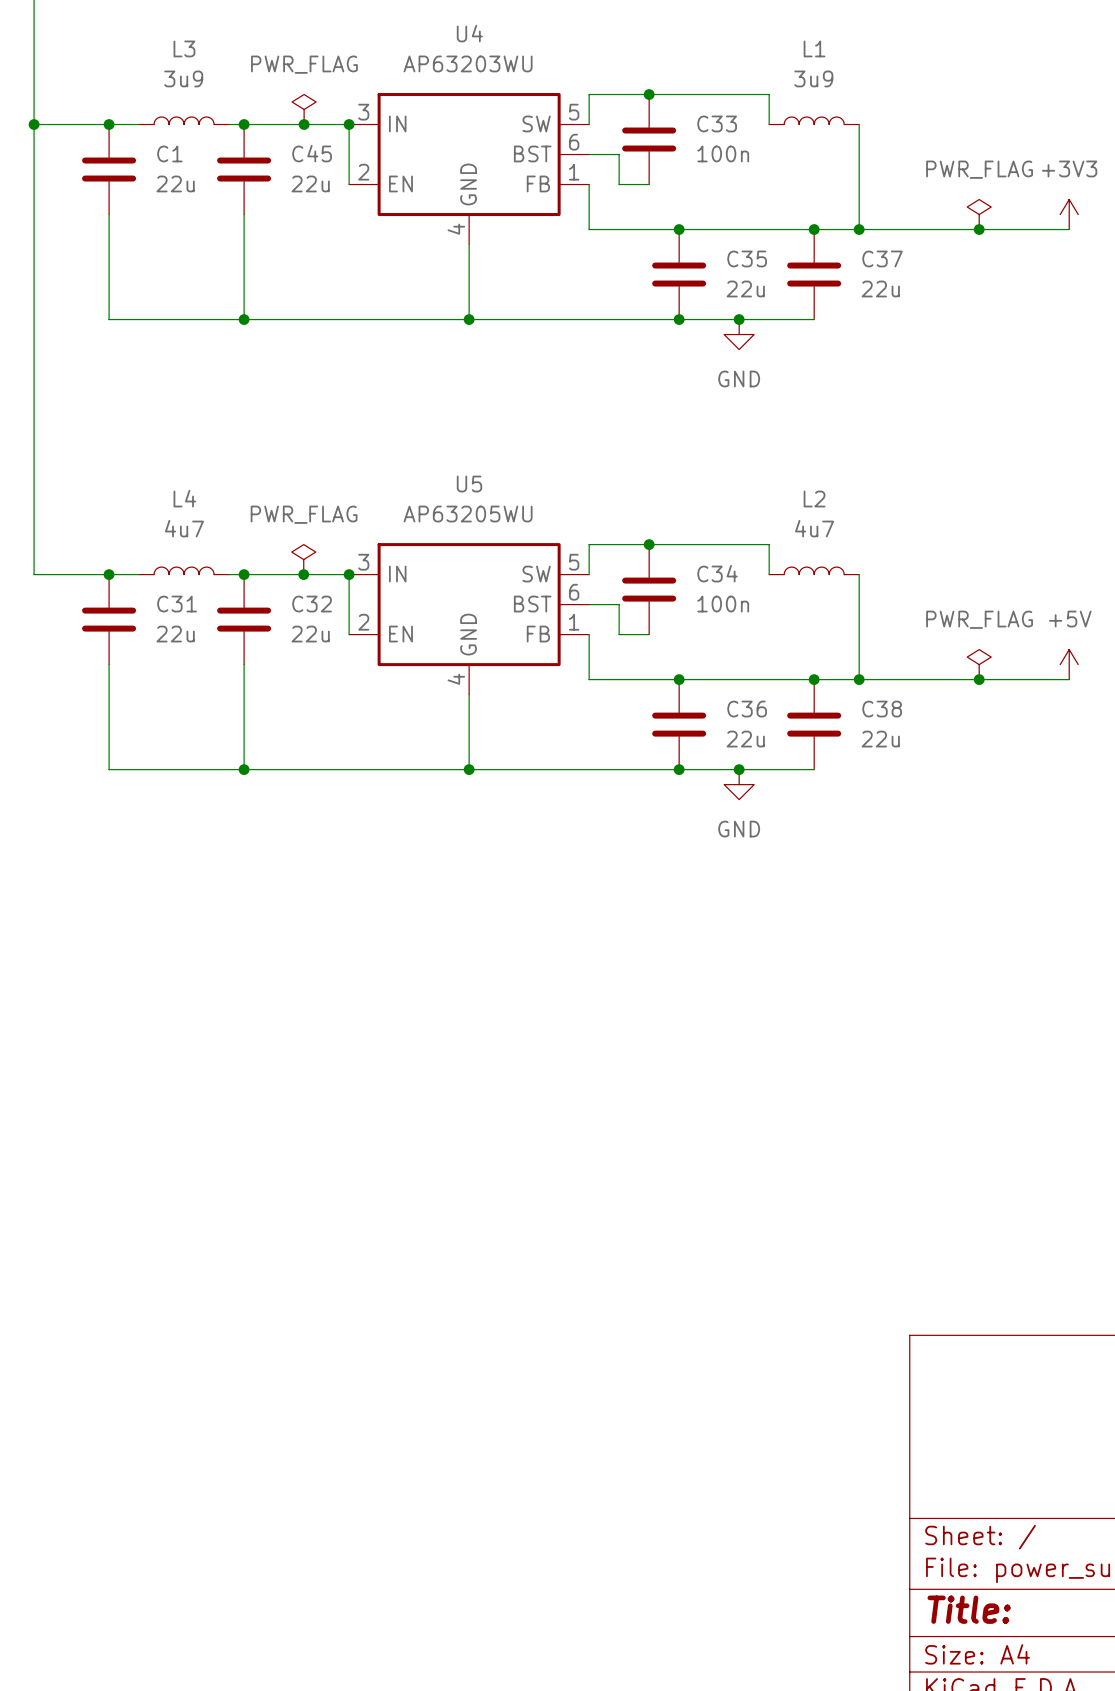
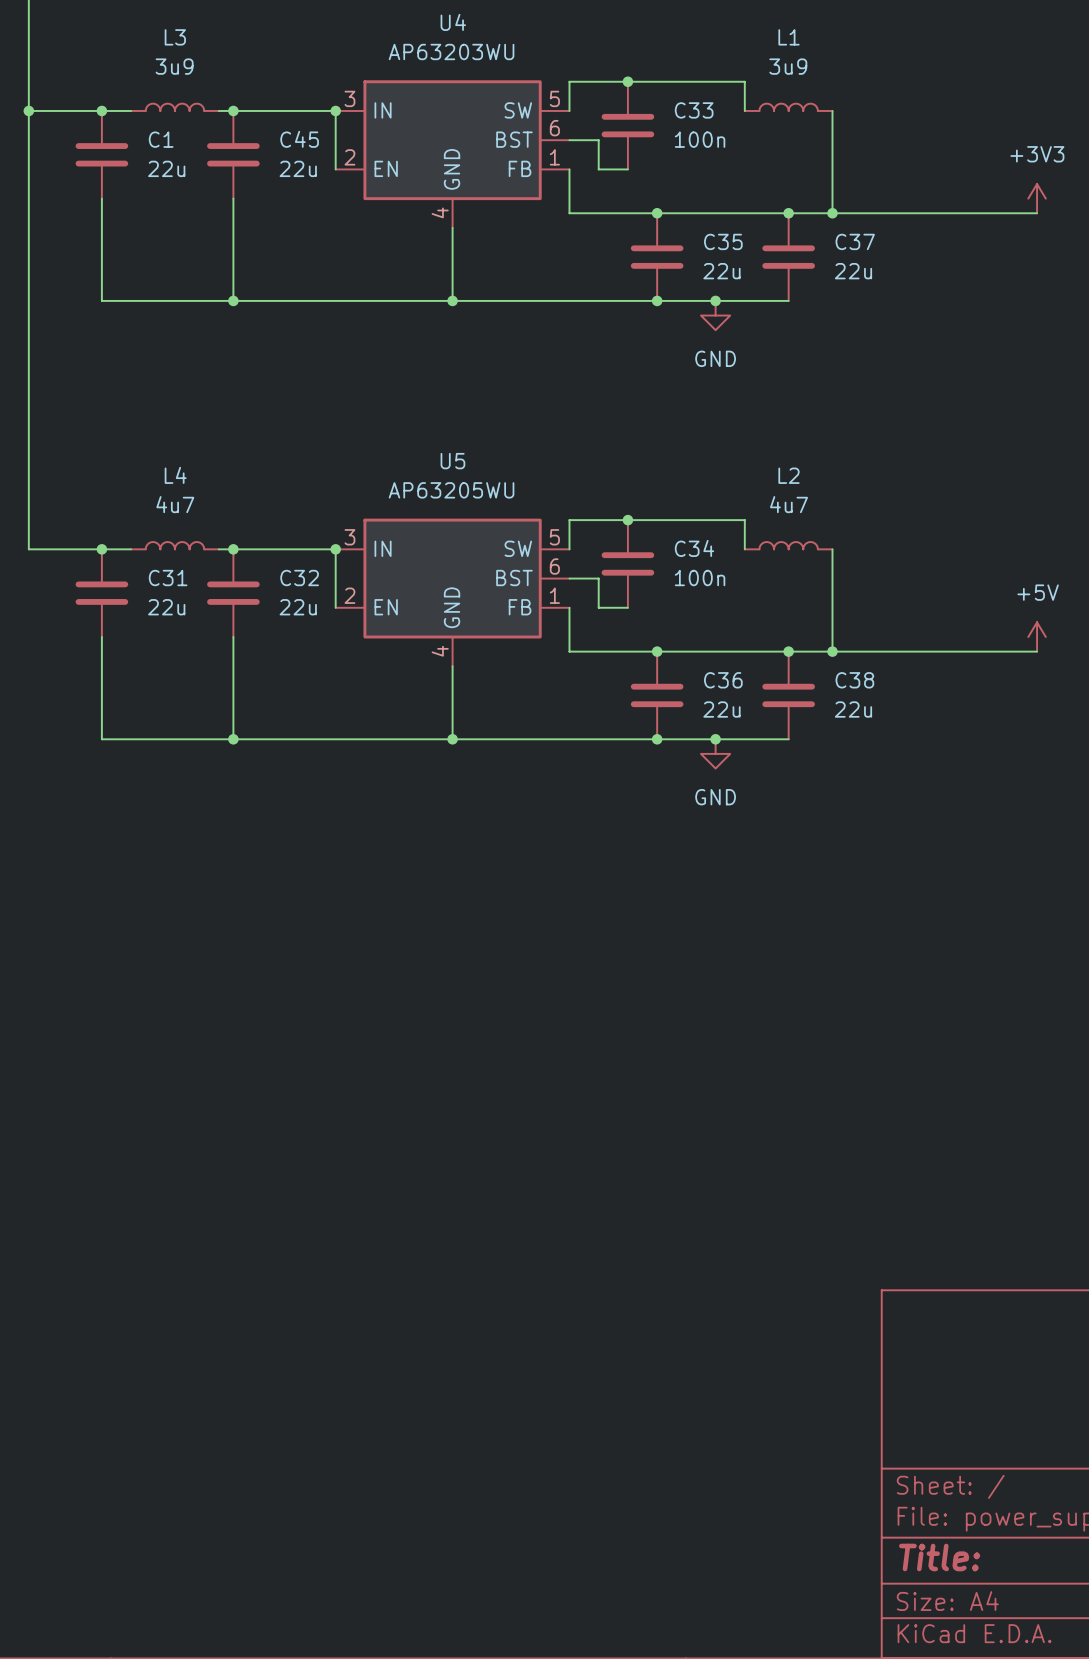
power symbol: PWR_FLAG (304, 109) -> none
junction: (304, 124) -> none
power symbol: PWR_FLAG (979, 214) -> none
junction: (979, 229) -> none
power symbol: PWR_FLAG (303, 559) -> none
junction: (303, 574) -> none
power symbol: PWR_FLAG (979, 664) -> none
junction: (979, 679) -> none

